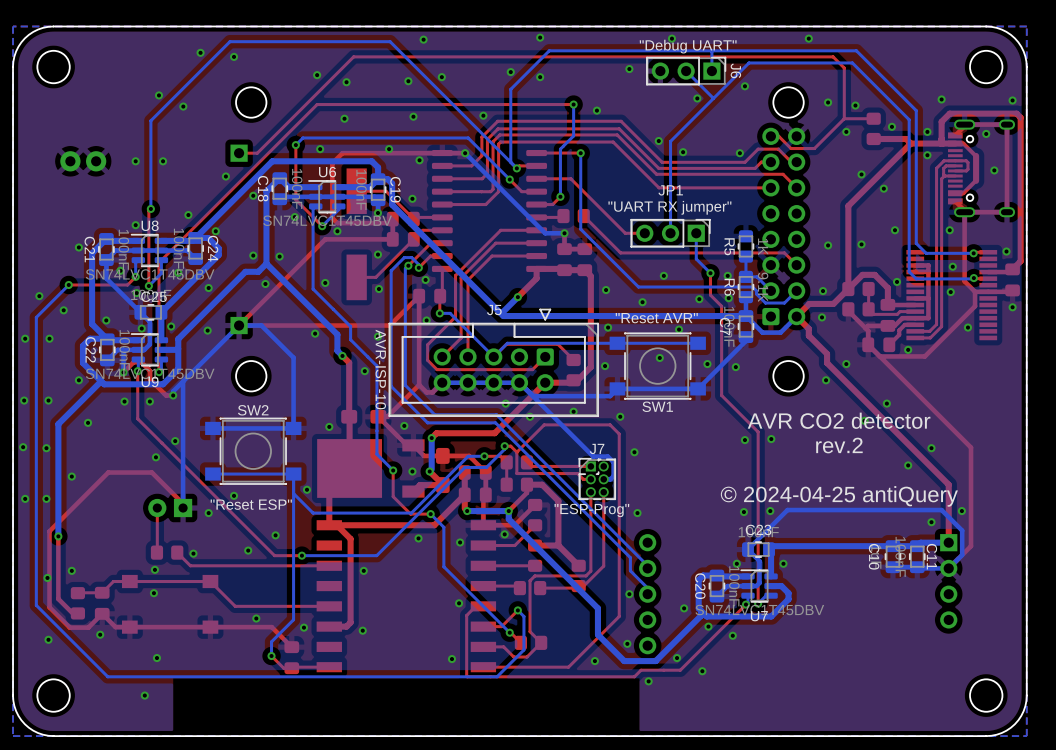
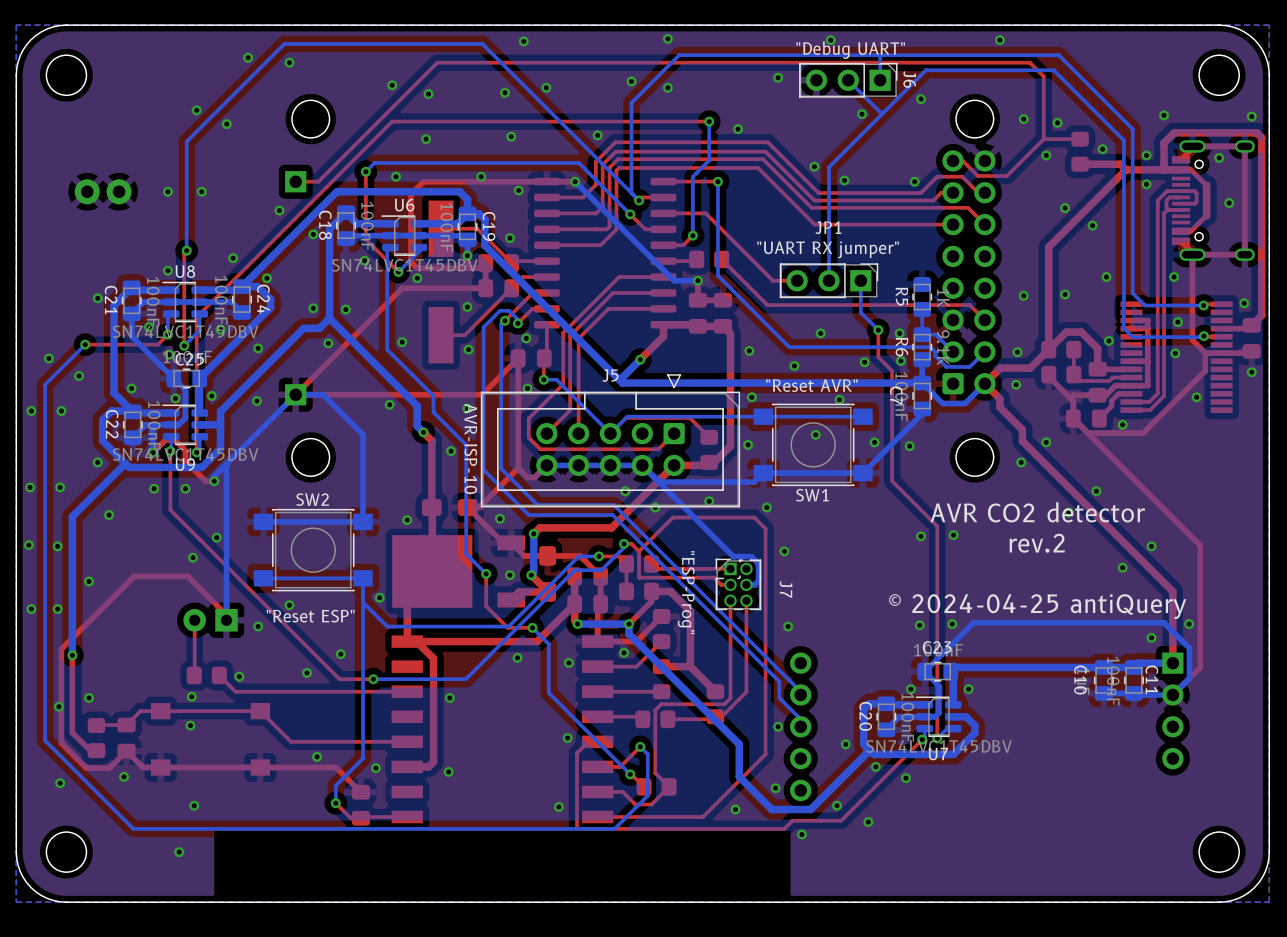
J7 name rotation: 0° (597, 448) -> 90° clockwise (786, 589)
J7 name position: J7 (597, 448) -> J7 (786, 589)
J7 value rotation: 0° (591, 510) -> 90° clockwise (686, 592)

